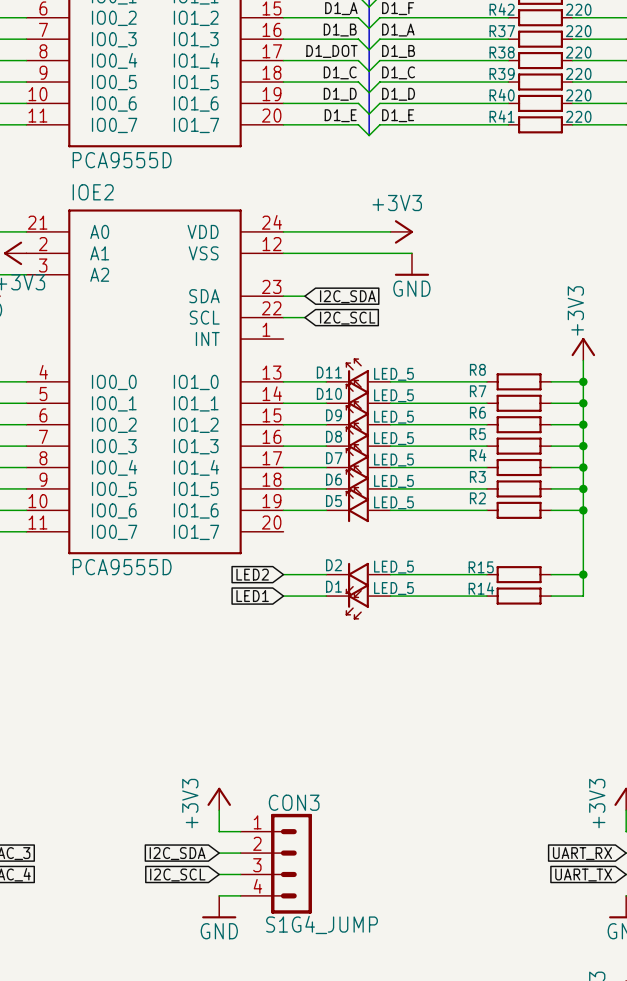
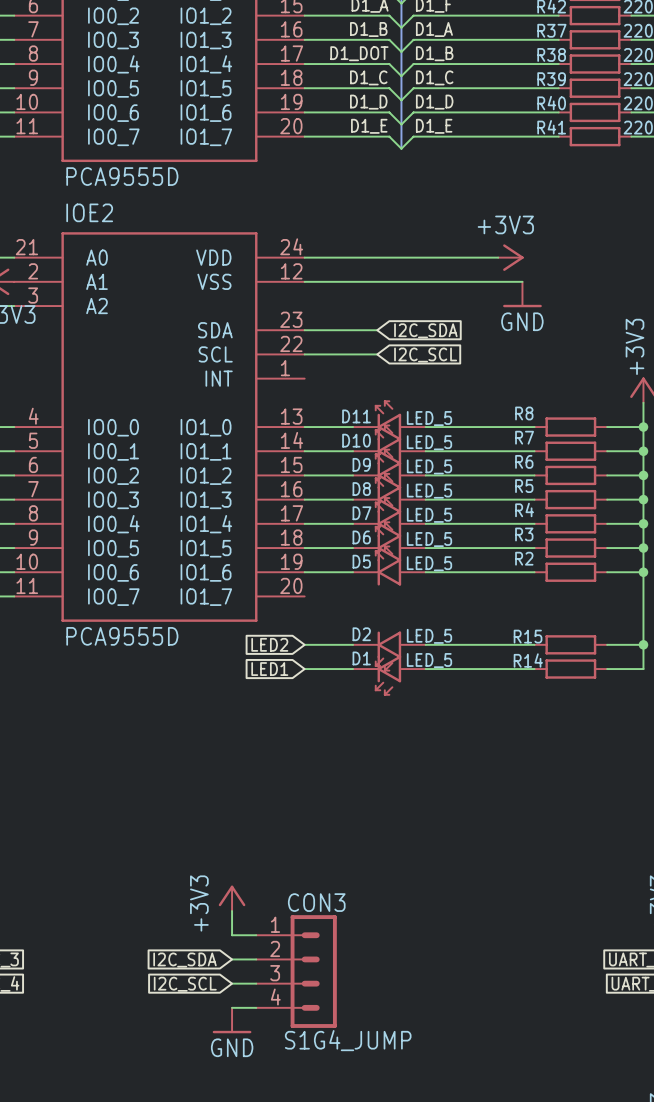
wire: none -> (425, 257) (498, 257)
power symbol position: +3V3 (401, 231) -> +3V3 (510, 257)
wire: none -> (449, 281) (522, 281)
power symbol position: GND (411, 264) -> GND (522, 294)
wire: none -> (328, 330) (377, 330)
global label position: I2C_SDA (347, 296) -> I2C_SDA (425, 330)
wire: none -> (328, 354) (377, 354)
global label position: I2C_SCL (347, 318) -> I2C_SCL (425, 355)

